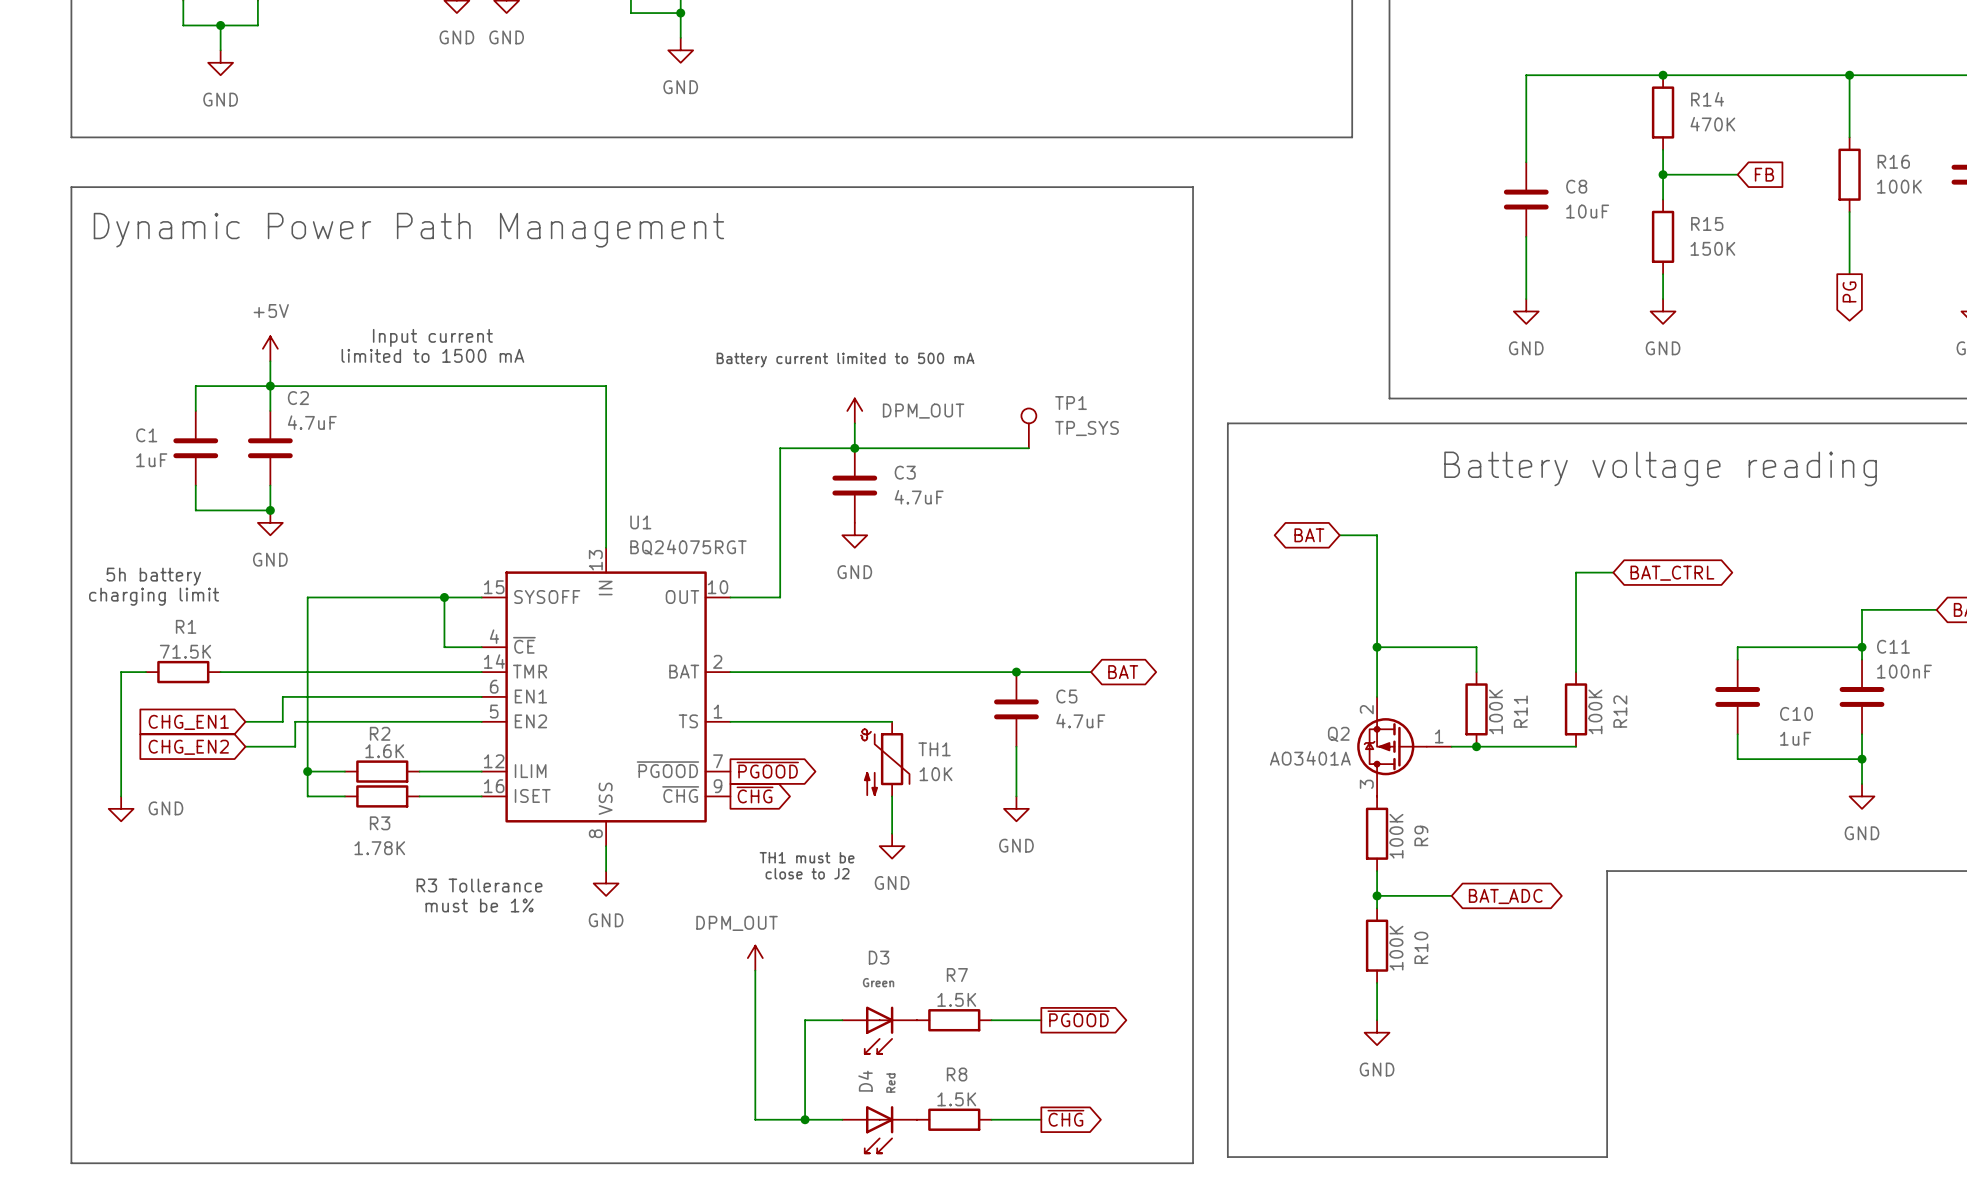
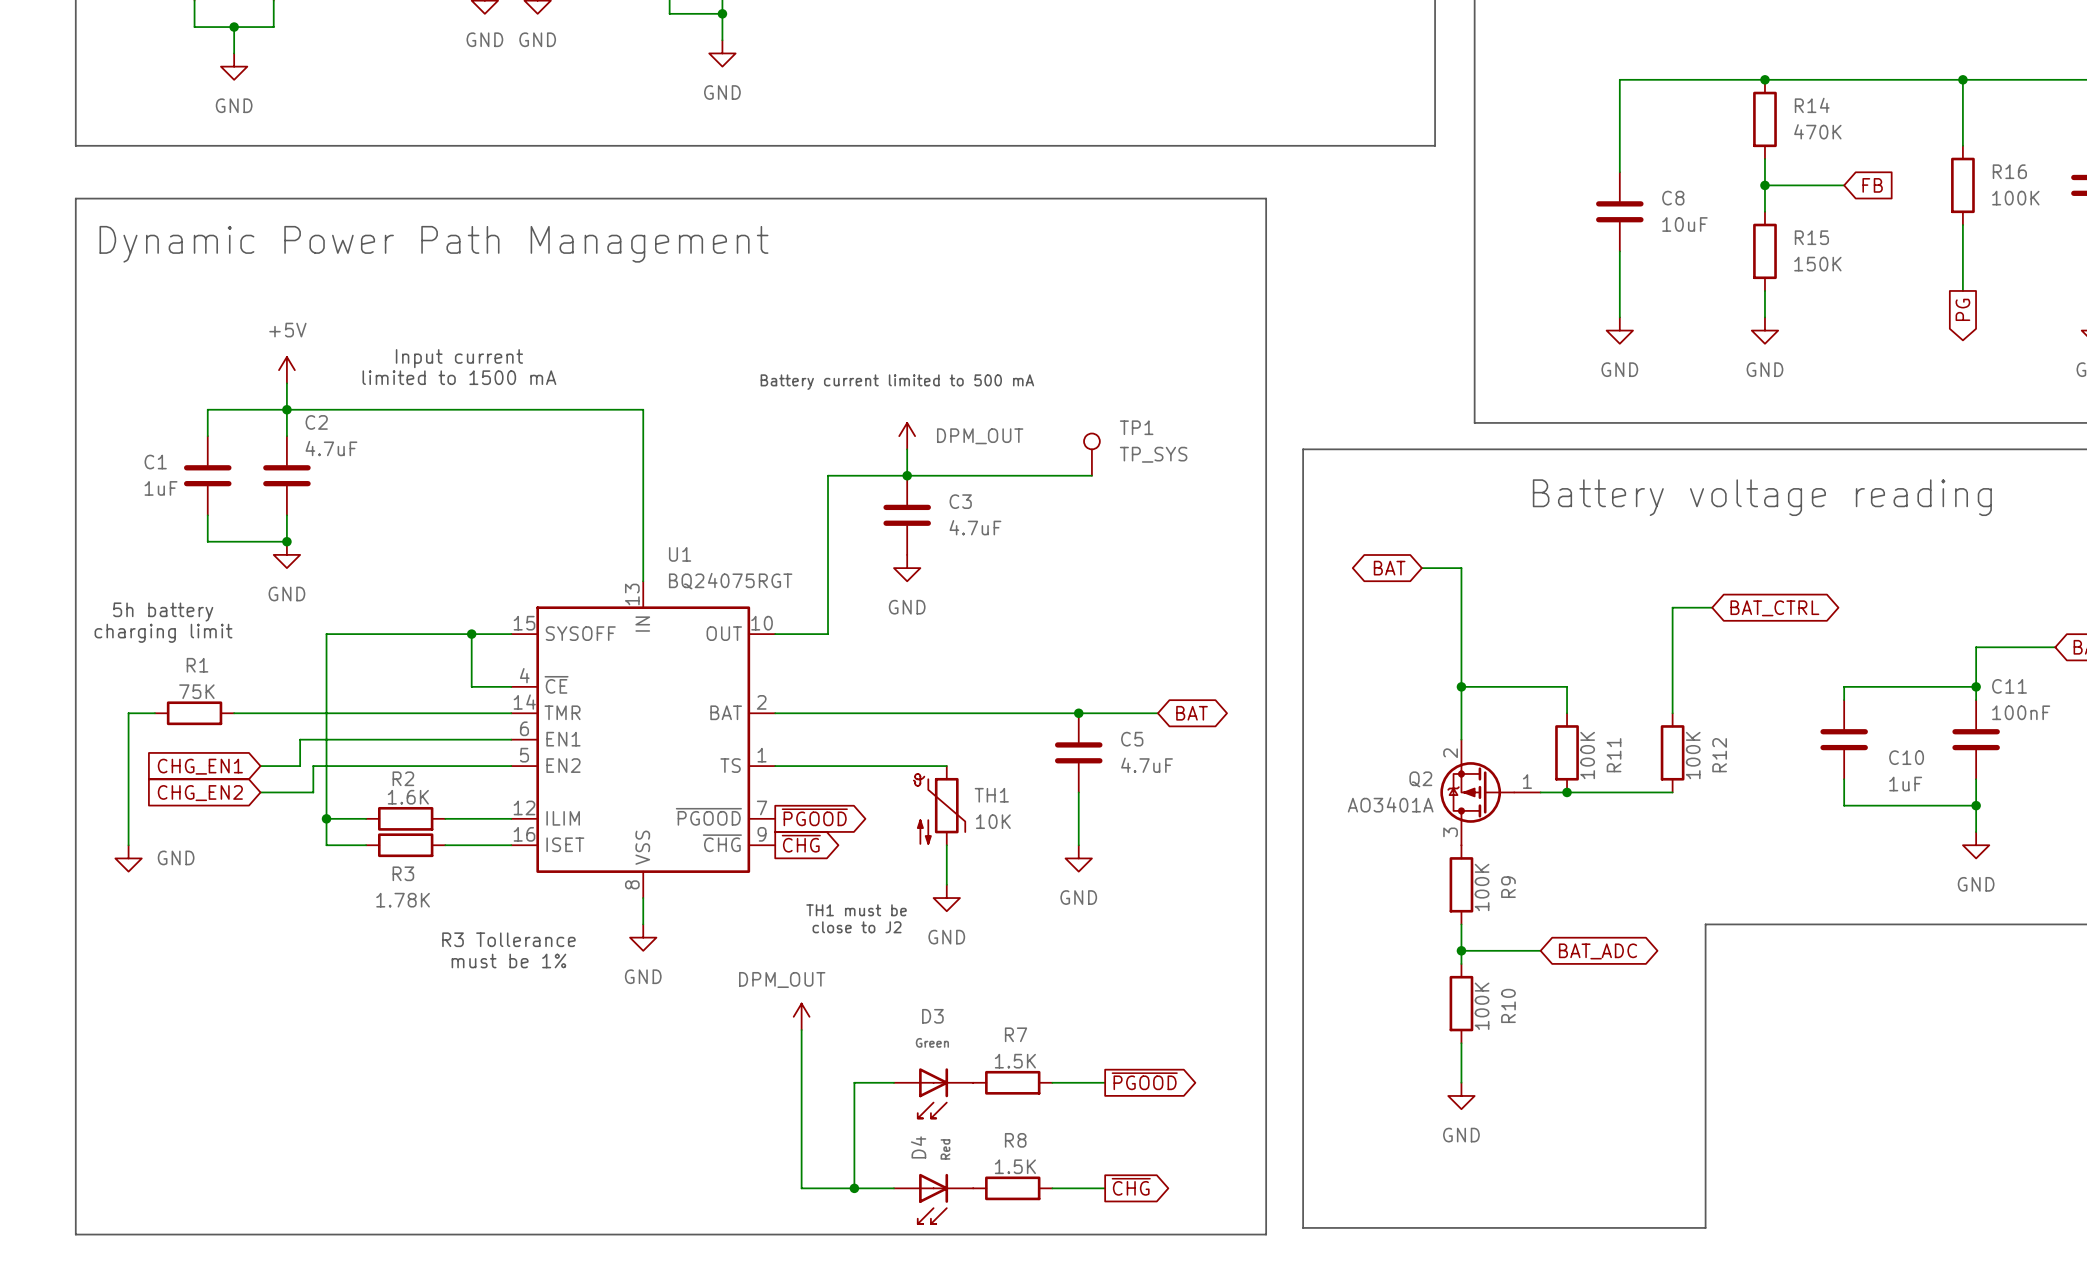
R1 value: 71.5K (185, 651) -> 75K (196, 691)

